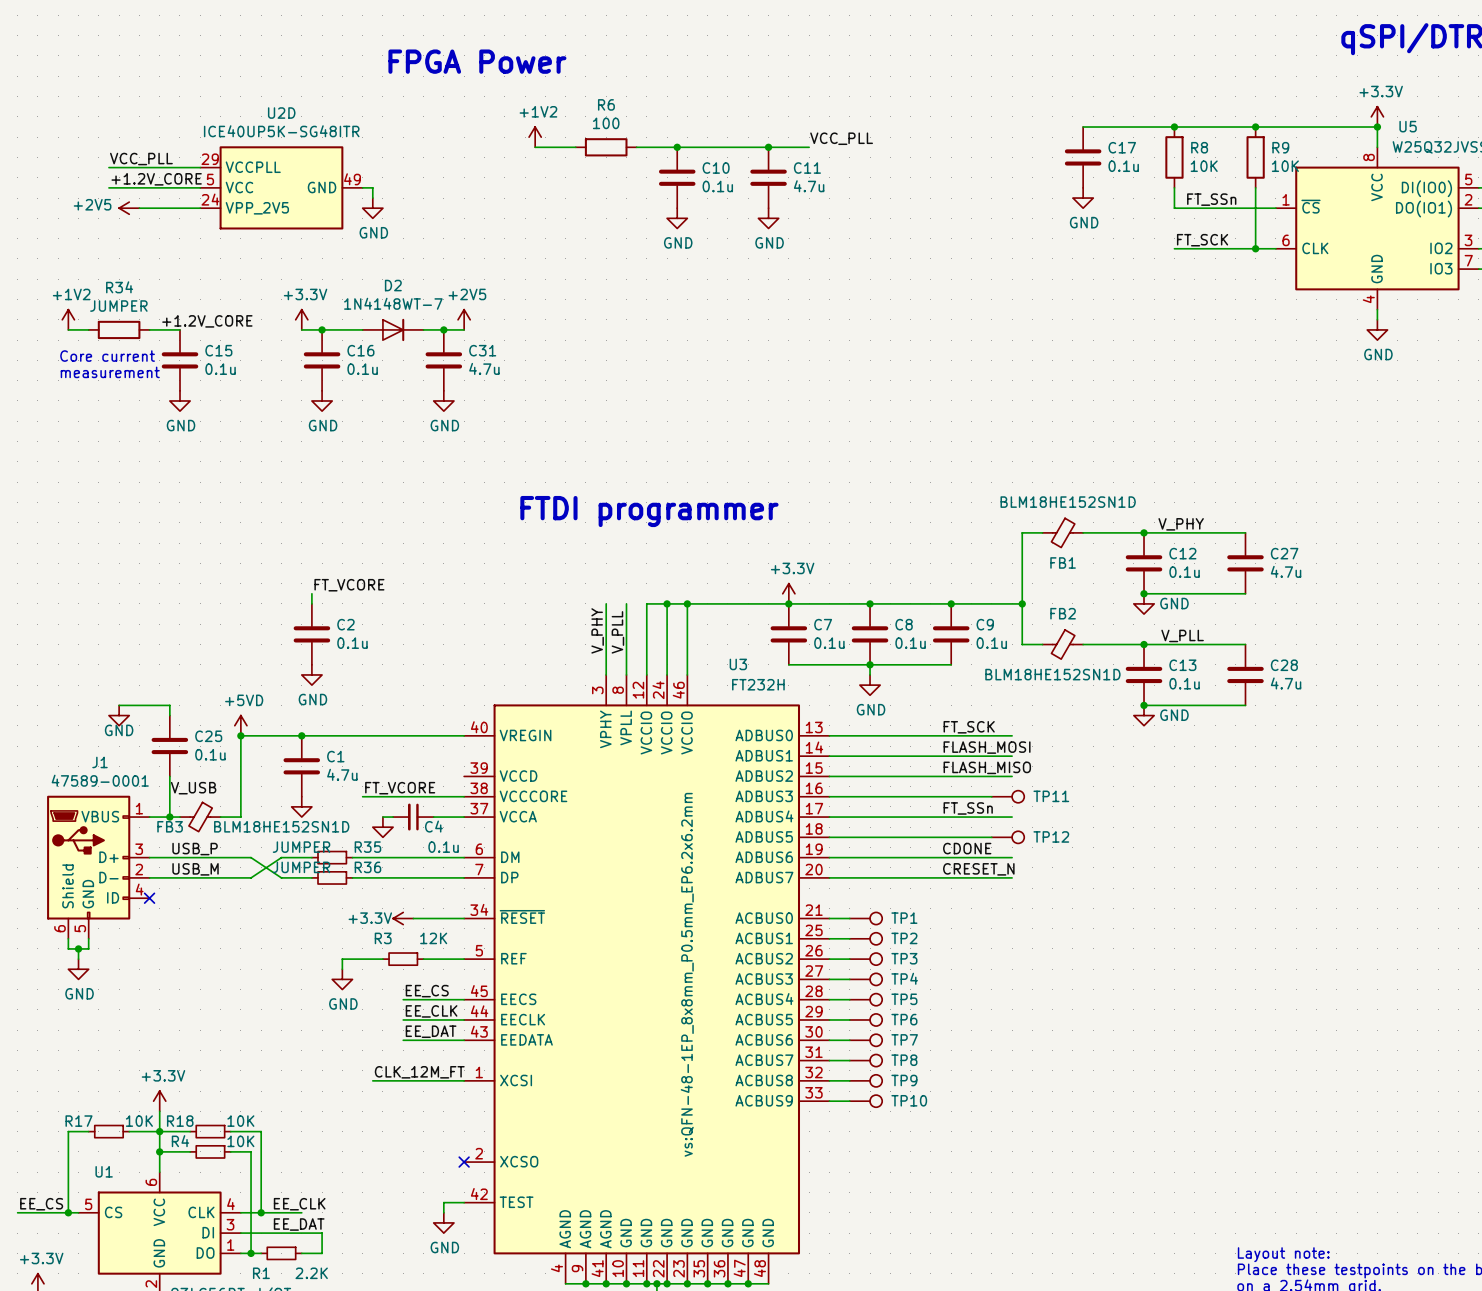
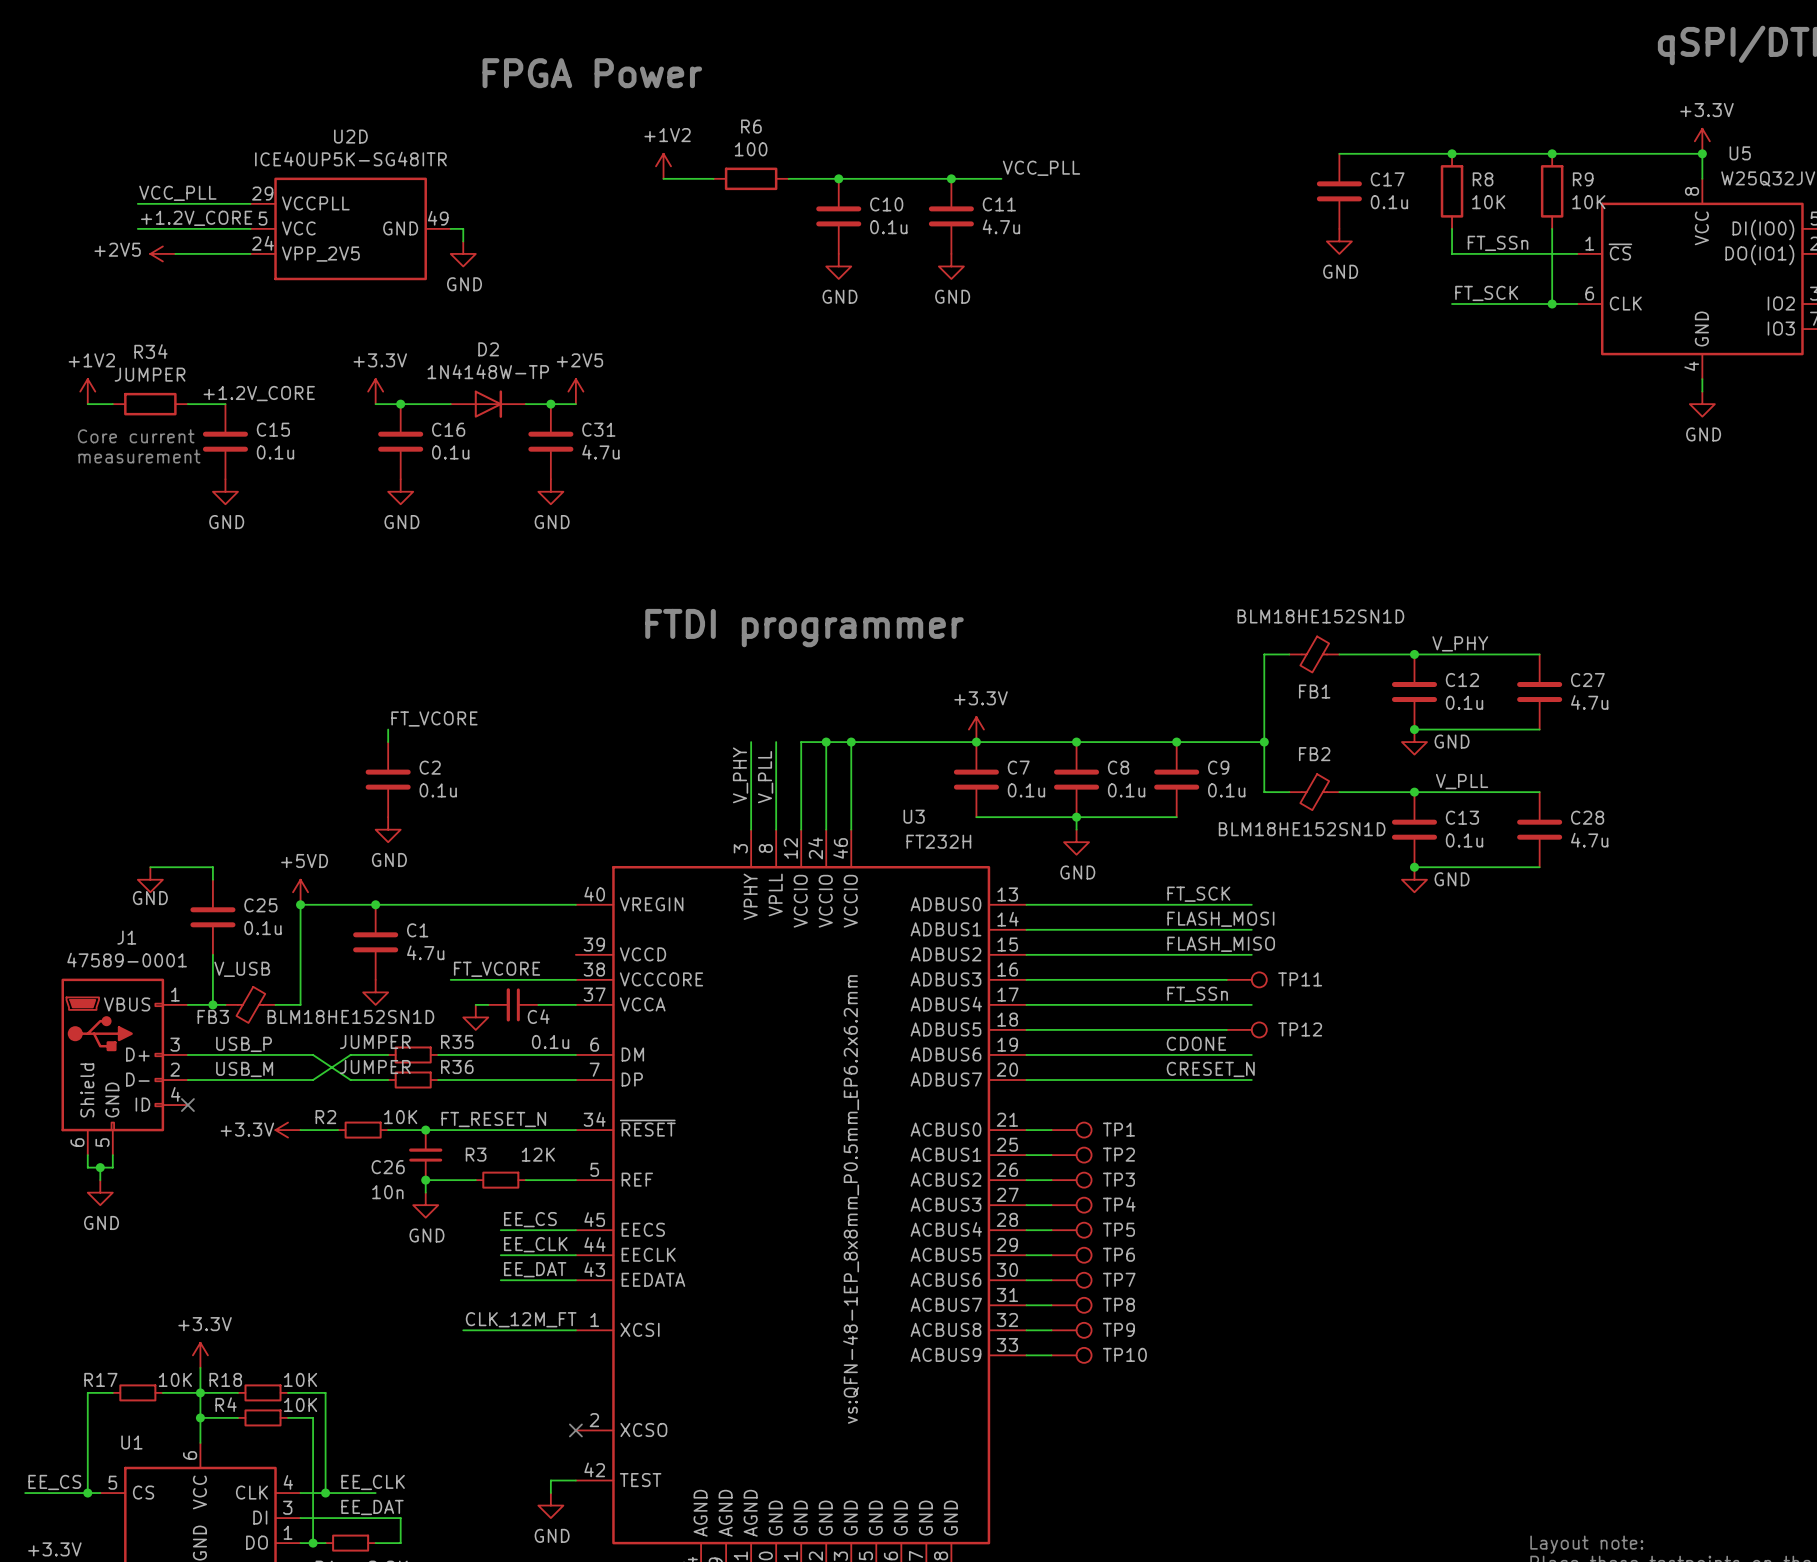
D2 value: 1N4148WT-7 (393, 303) -> 1N4148W-TP (488, 371)
label: none -> FT_RESET_N (493, 1119)
wire: none -> (300, 1130) (338, 1130)
R2: none -> 10K (363, 1130)
wire: none -> (388, 1130) (513, 1130)
junction: none -> (425, 1130)
power symbol position: +3.3V (403, 918) -> +3.3V (288, 1130)
C26: none -> 10n (425, 1155)
junction: none -> (425, 1180)

